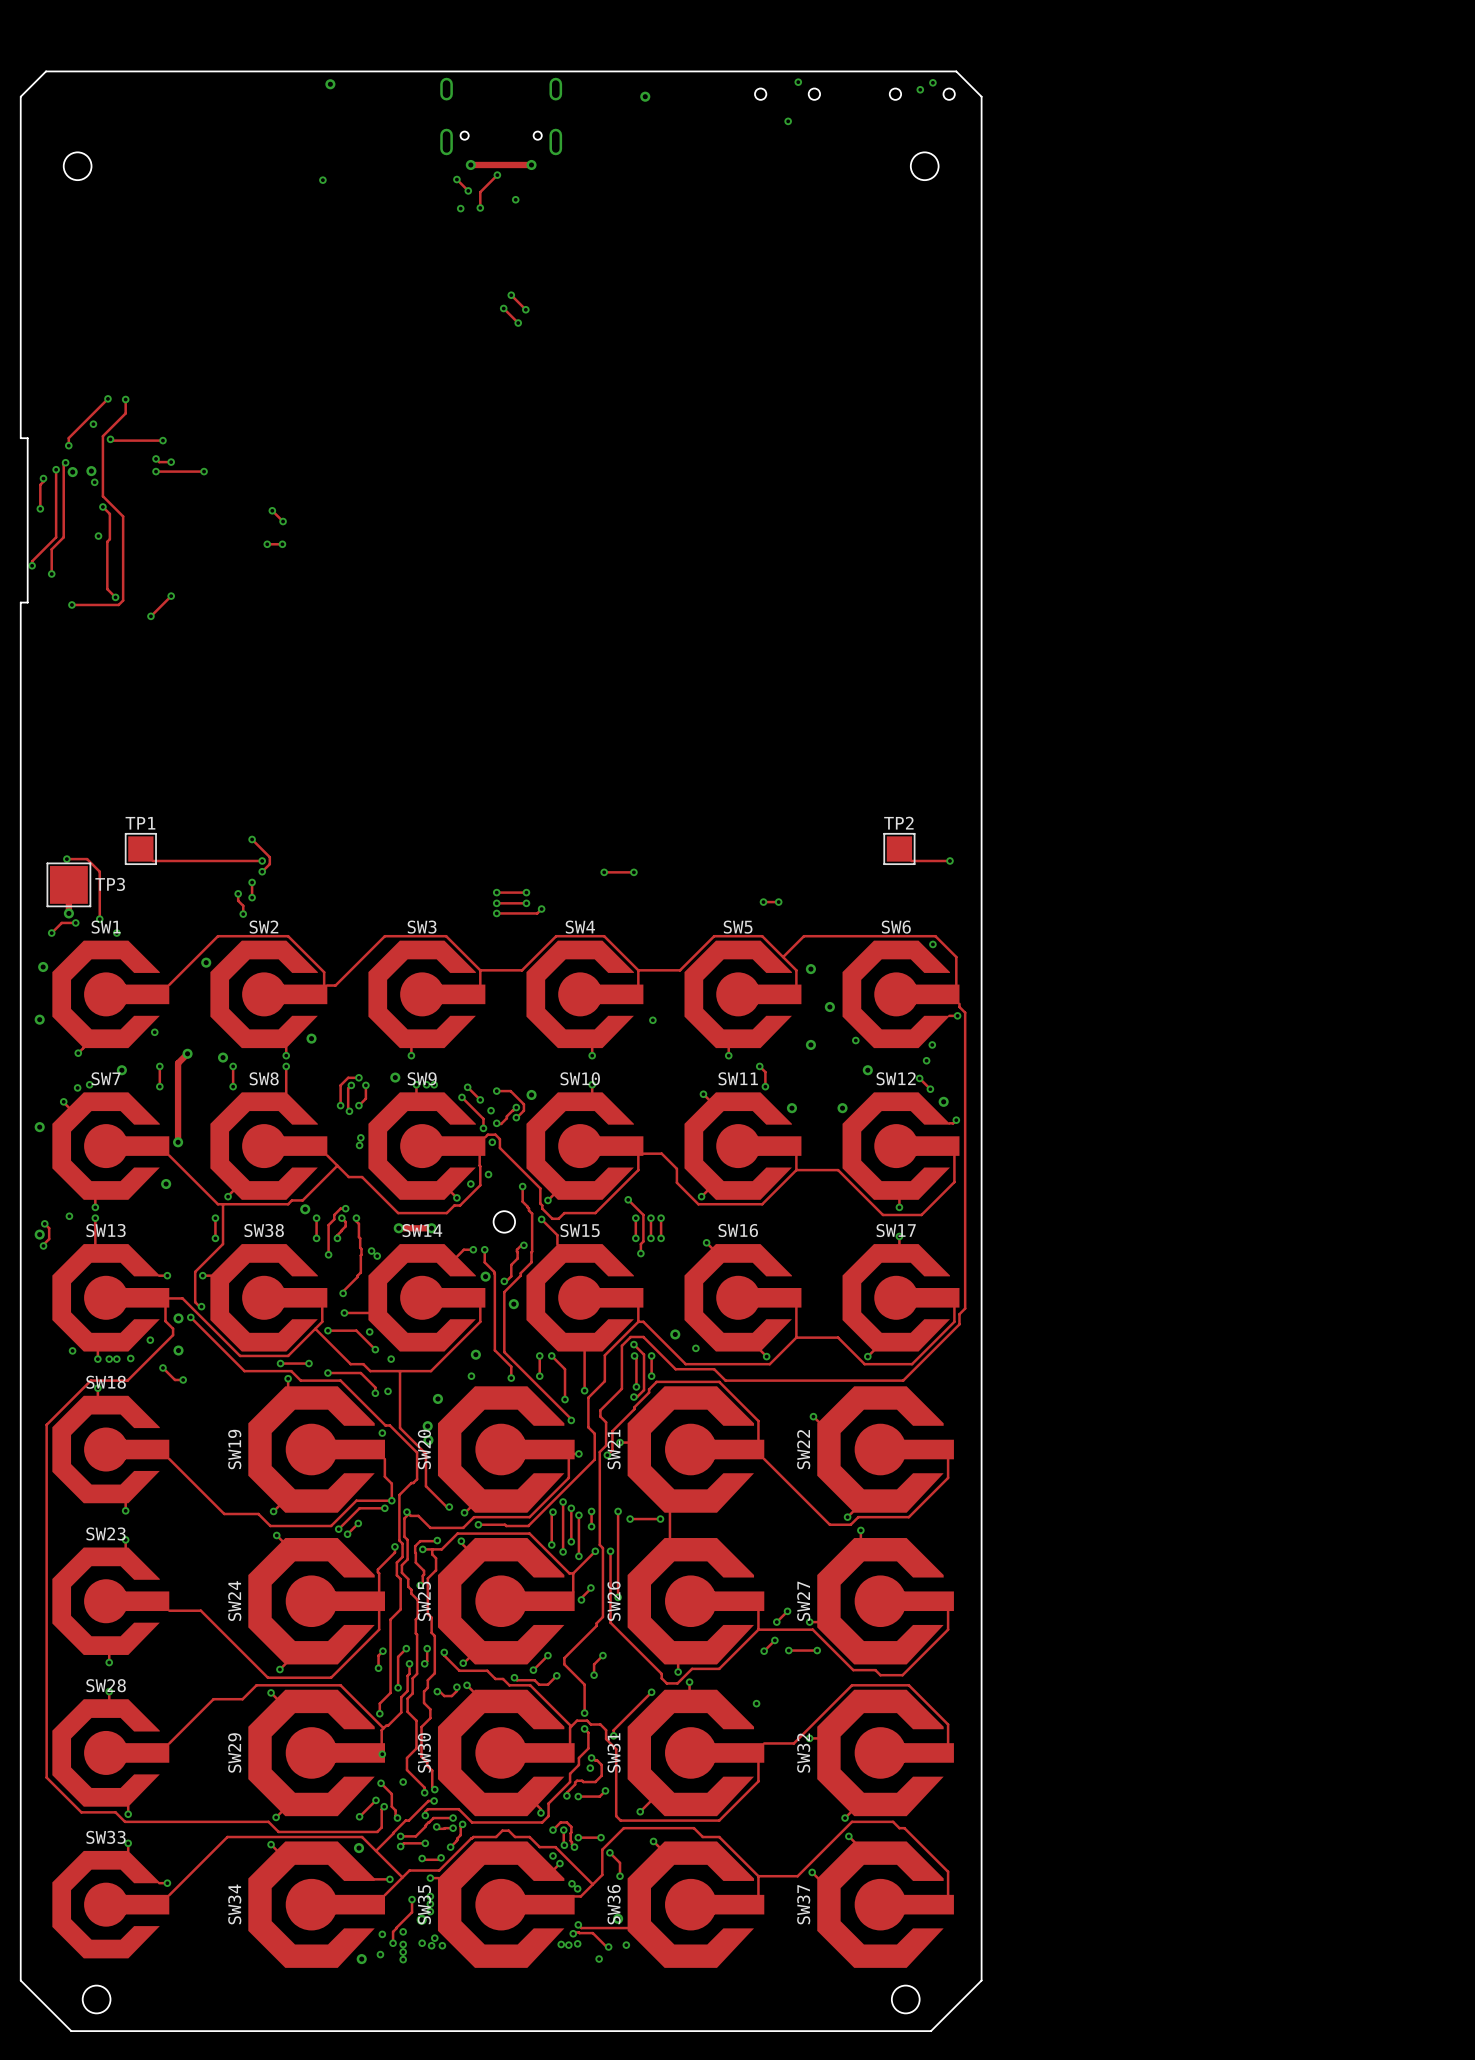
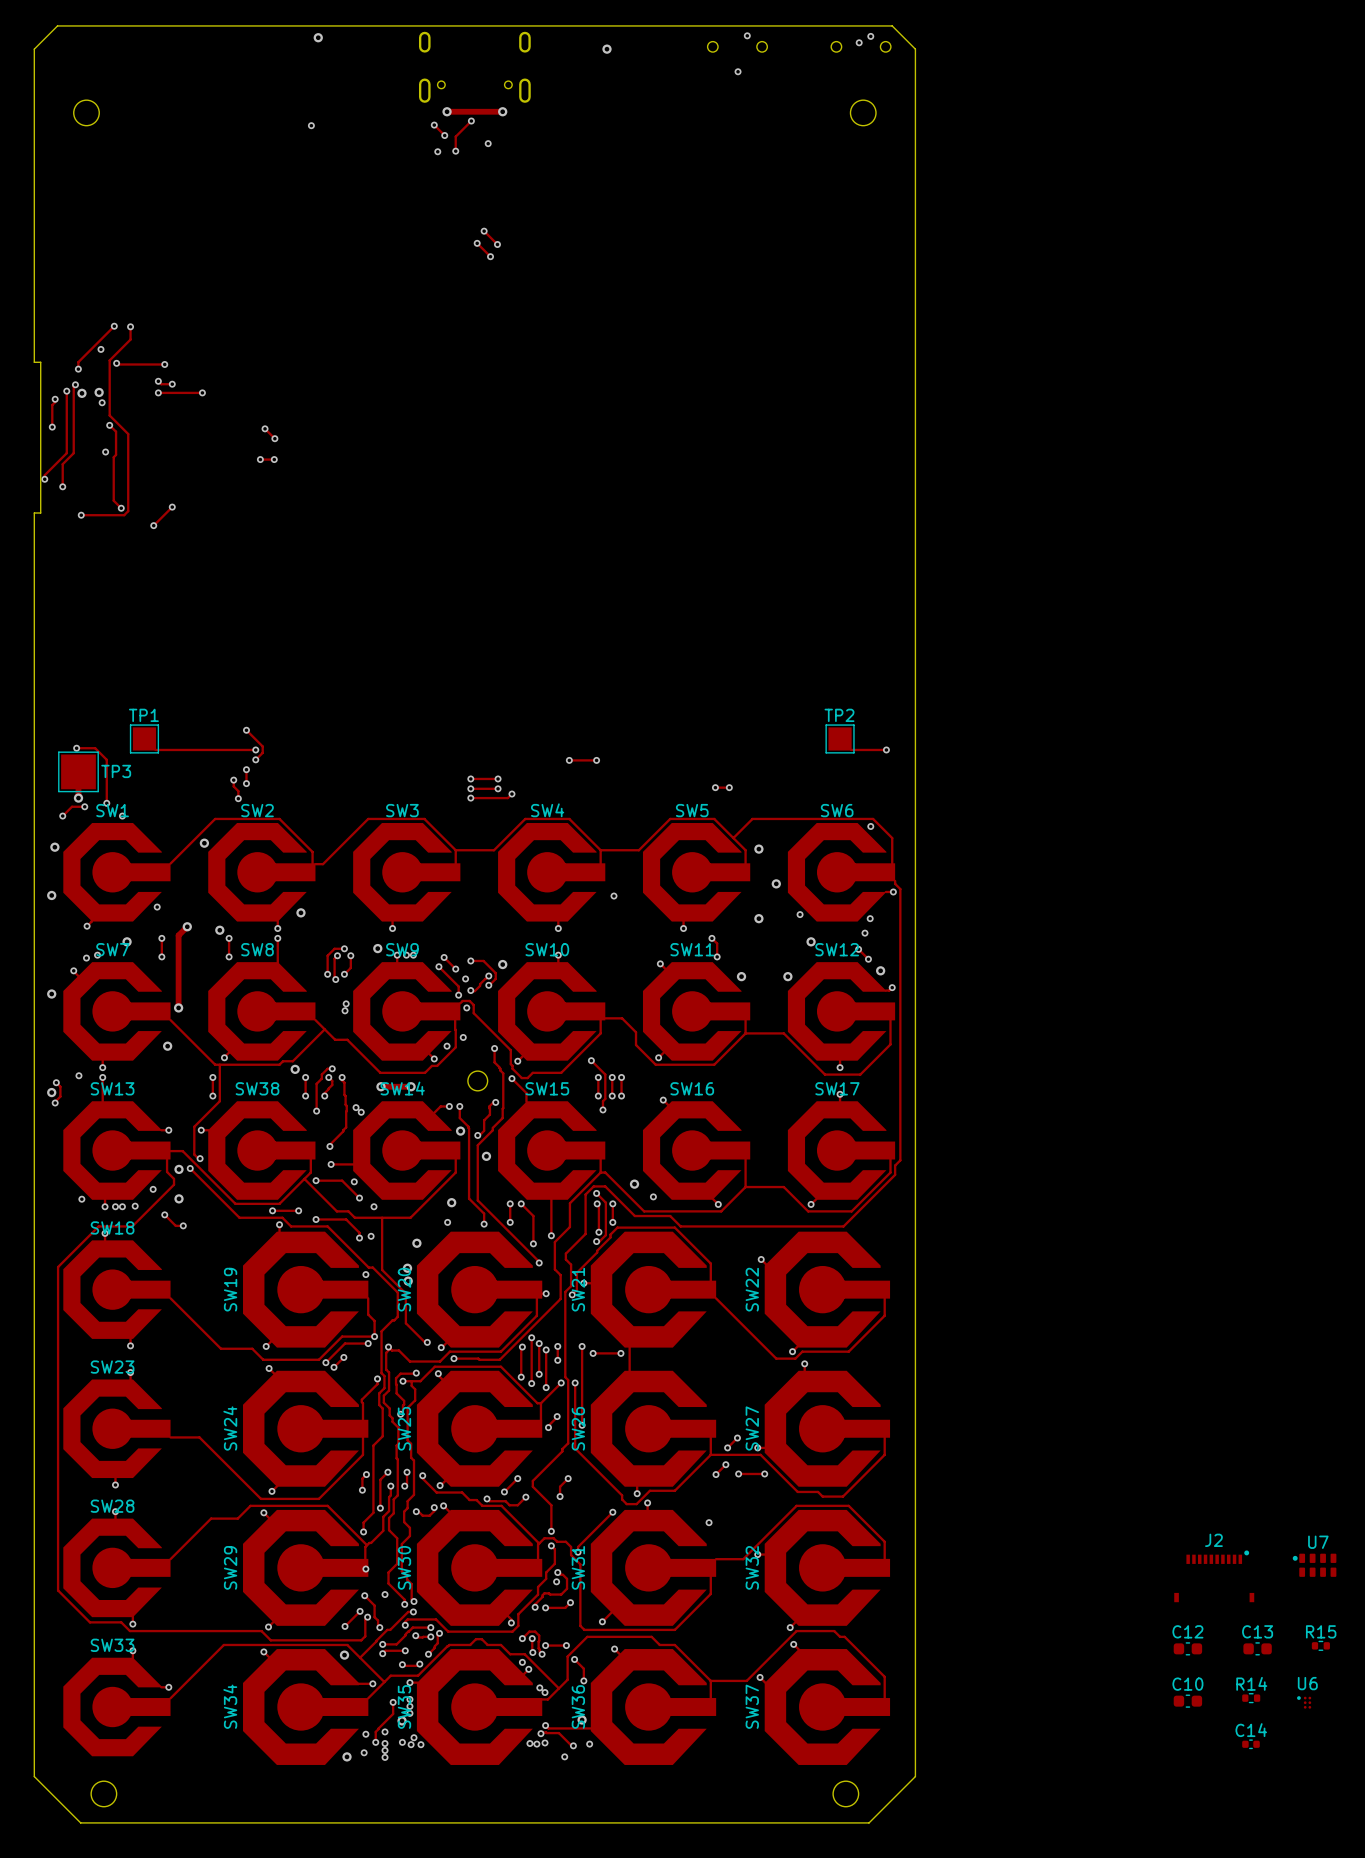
U7: none -> (1314, 1565)
J2: none -> (1214, 1576)
R15: none -> (1320, 1645)
C12: none -> (1187, 1648)
C13: none -> (1257, 1648)
R14: none -> (1251, 1698)
C10: none -> (1187, 1701)
U6: none -> (1304, 1702)
C14: none -> (1250, 1744)

